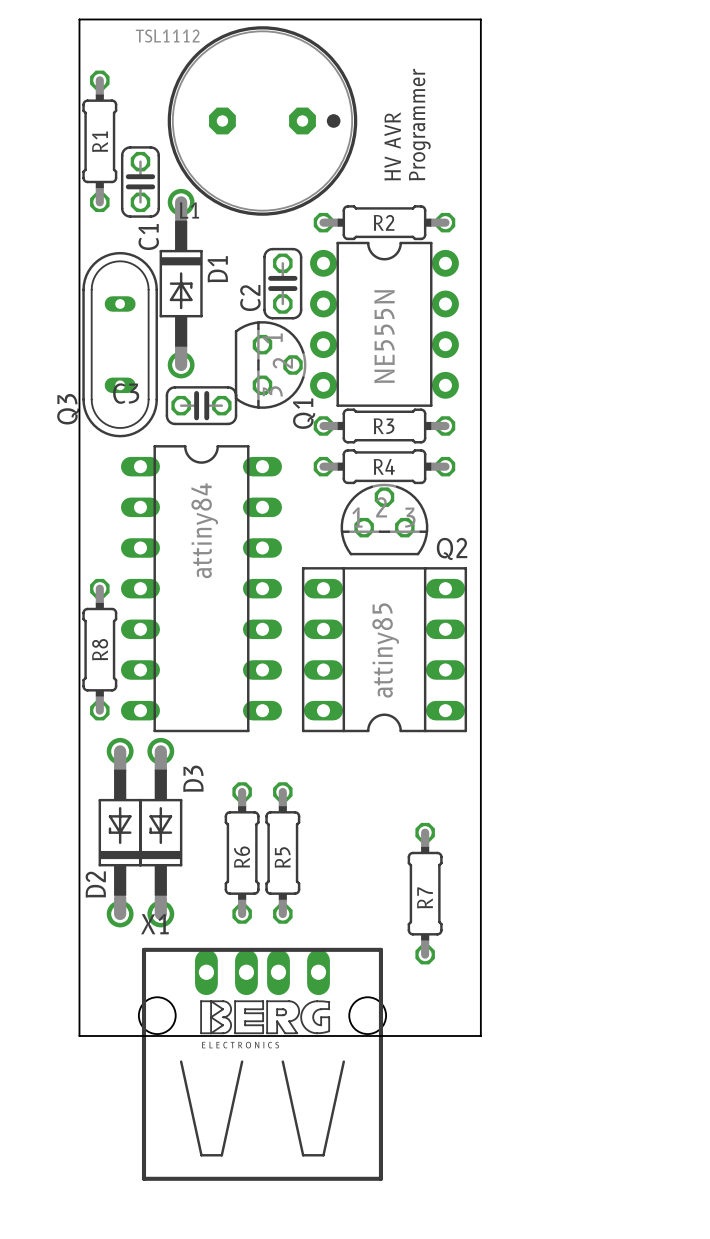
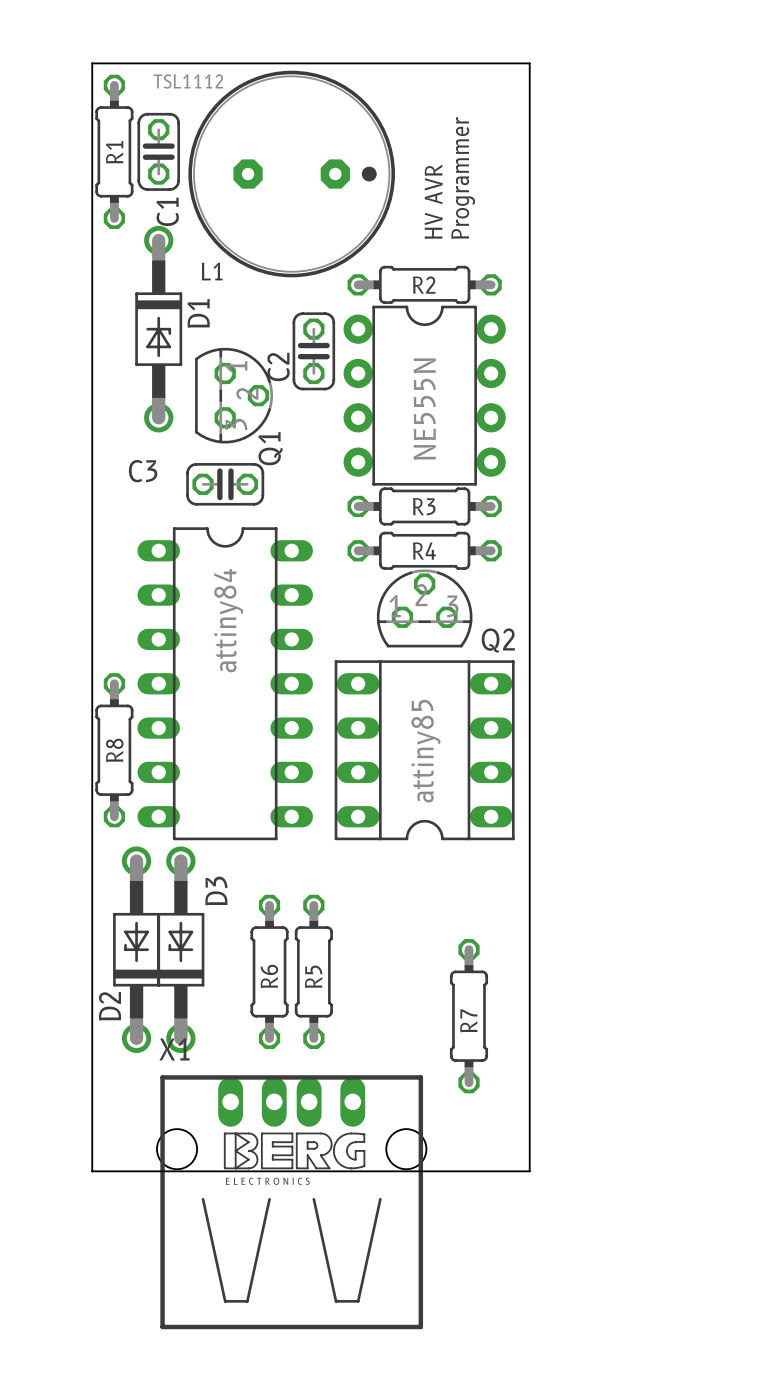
R1 position: (99, 141) -> (114, 151)
C1 position: (140, 181) -> (158, 151)
D1 position: (181, 283) -> (158, 329)
Q3: (120, 344) -> none
Q1 position: (270, 364) -> (234, 395)

